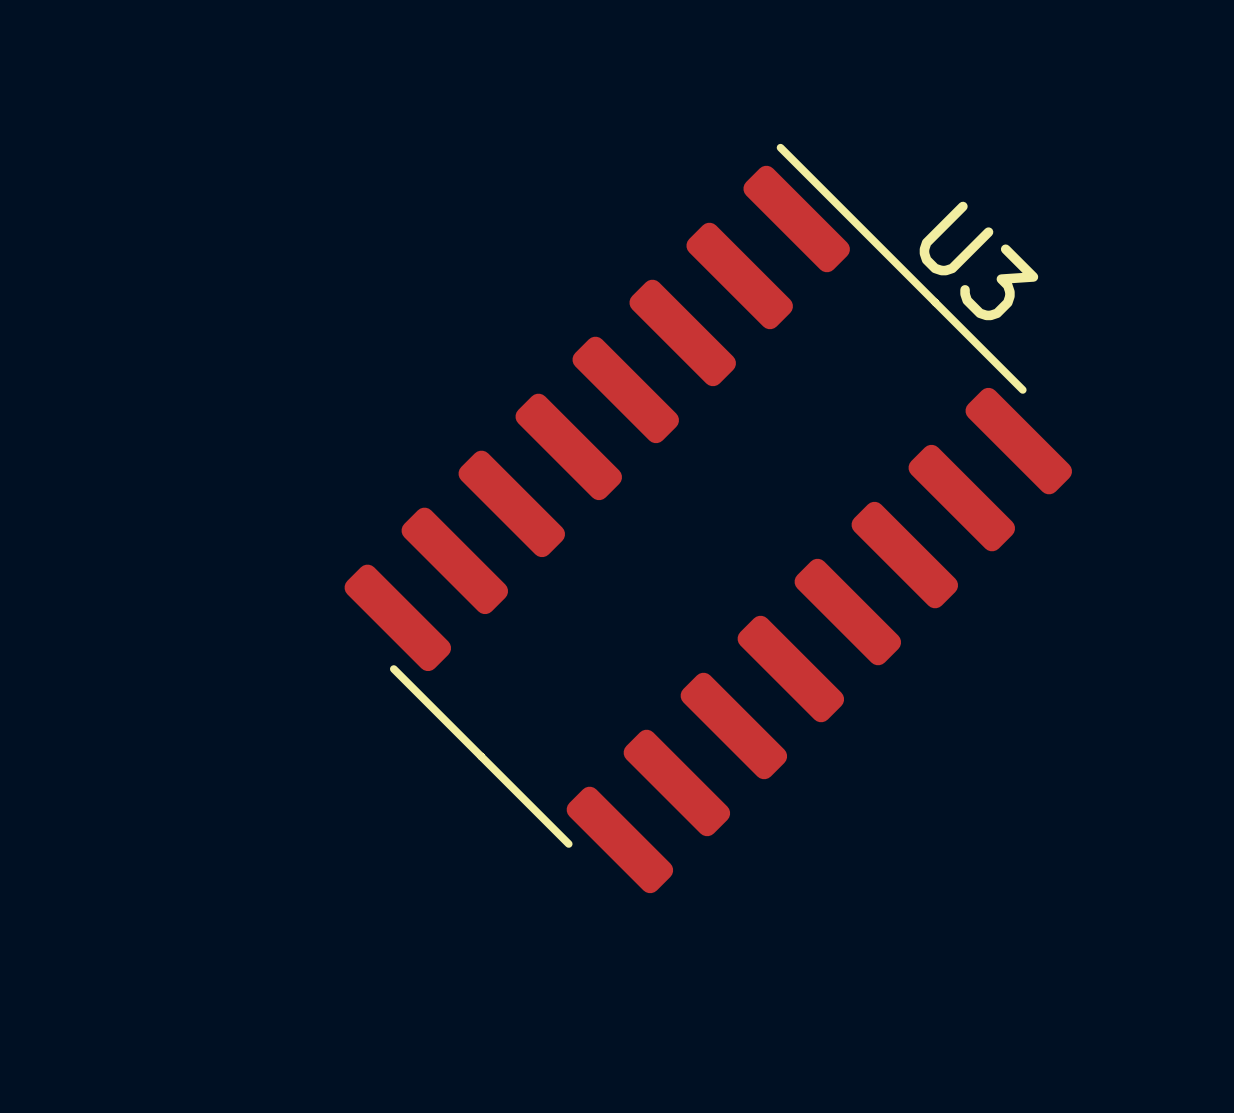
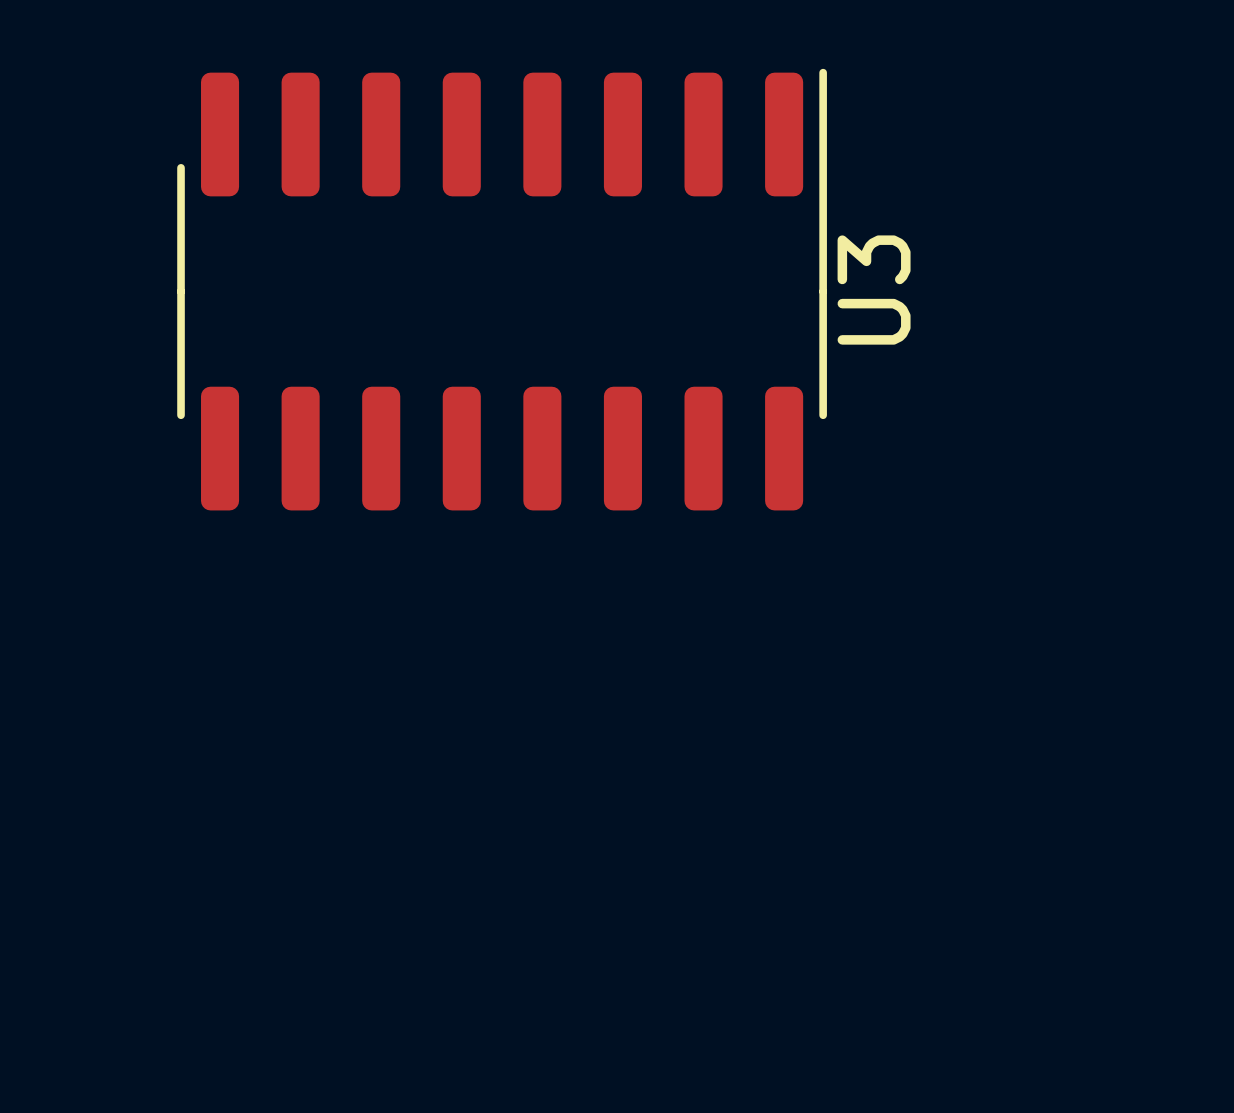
U3 rotation: 0° (708, 518) -> 45° clockwise (502, 289)

